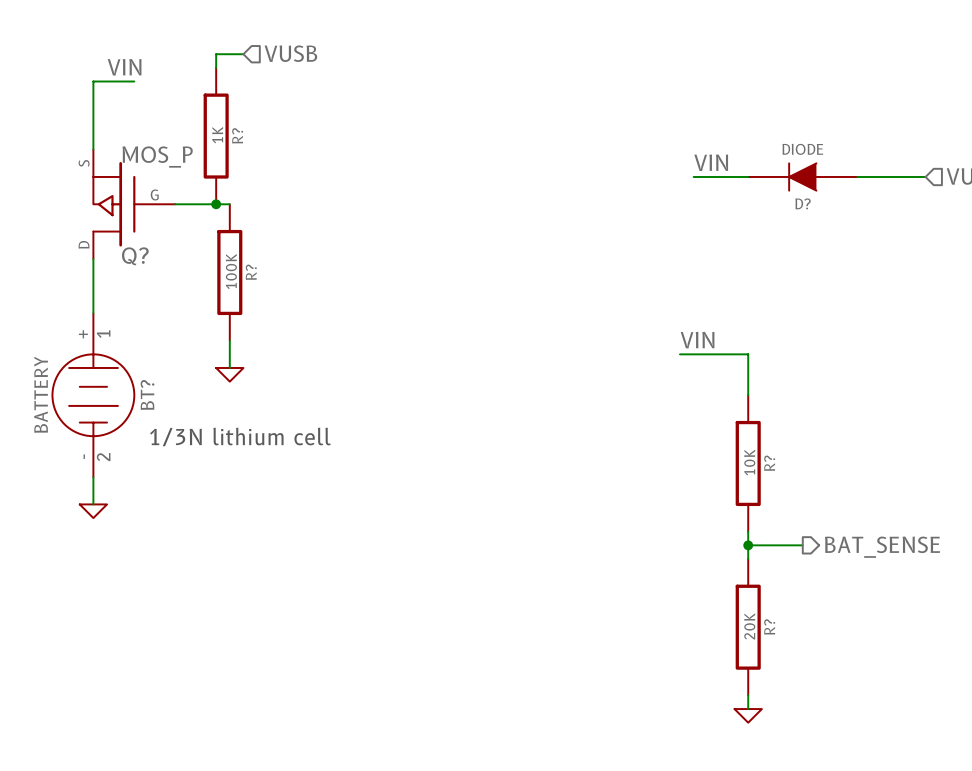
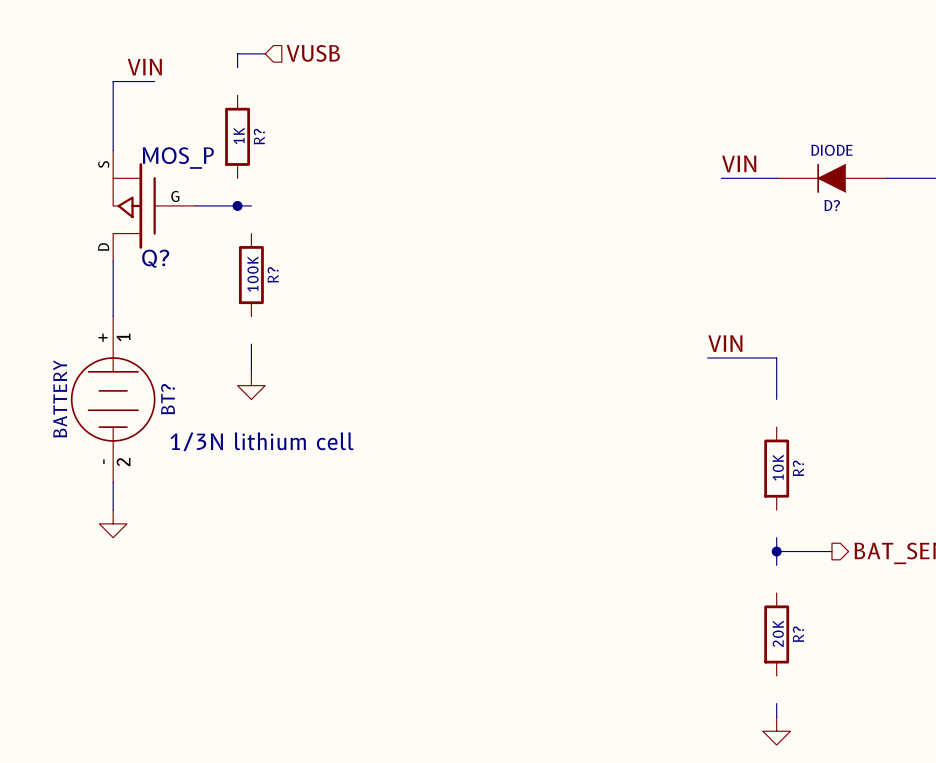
R? symbol: [203, 67, 229, 205] -> [225, 95, 251, 179]
R? symbol: [217, 204, 243, 341] -> [238, 233, 264, 317]
power symbol shape: [216, 367, 244, 382] -> [237, 371, 266, 400]
R? symbol: [735, 395, 761, 532] -> [764, 427, 790, 511]
power symbol shape: [79, 504, 108, 519] -> [99, 510, 127, 538]
R? symbol: [735, 558, 761, 696] -> [764, 593, 790, 676]
power symbol shape: [734, 709, 762, 723] -> [762, 717, 791, 746]

